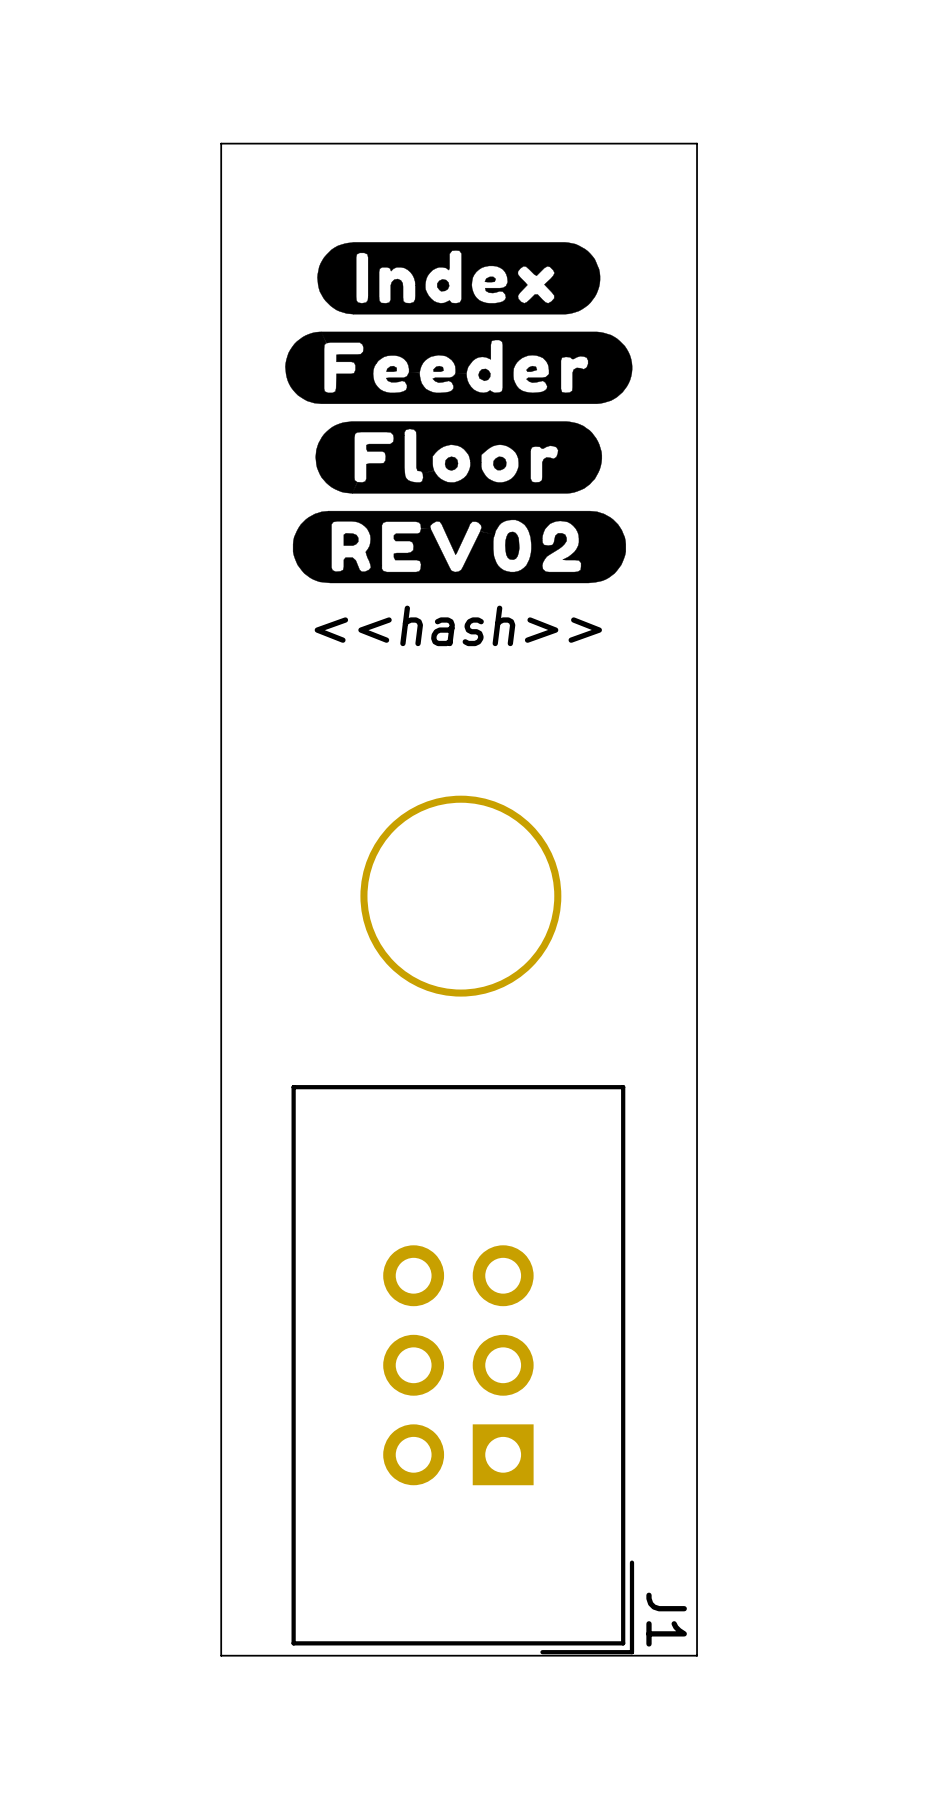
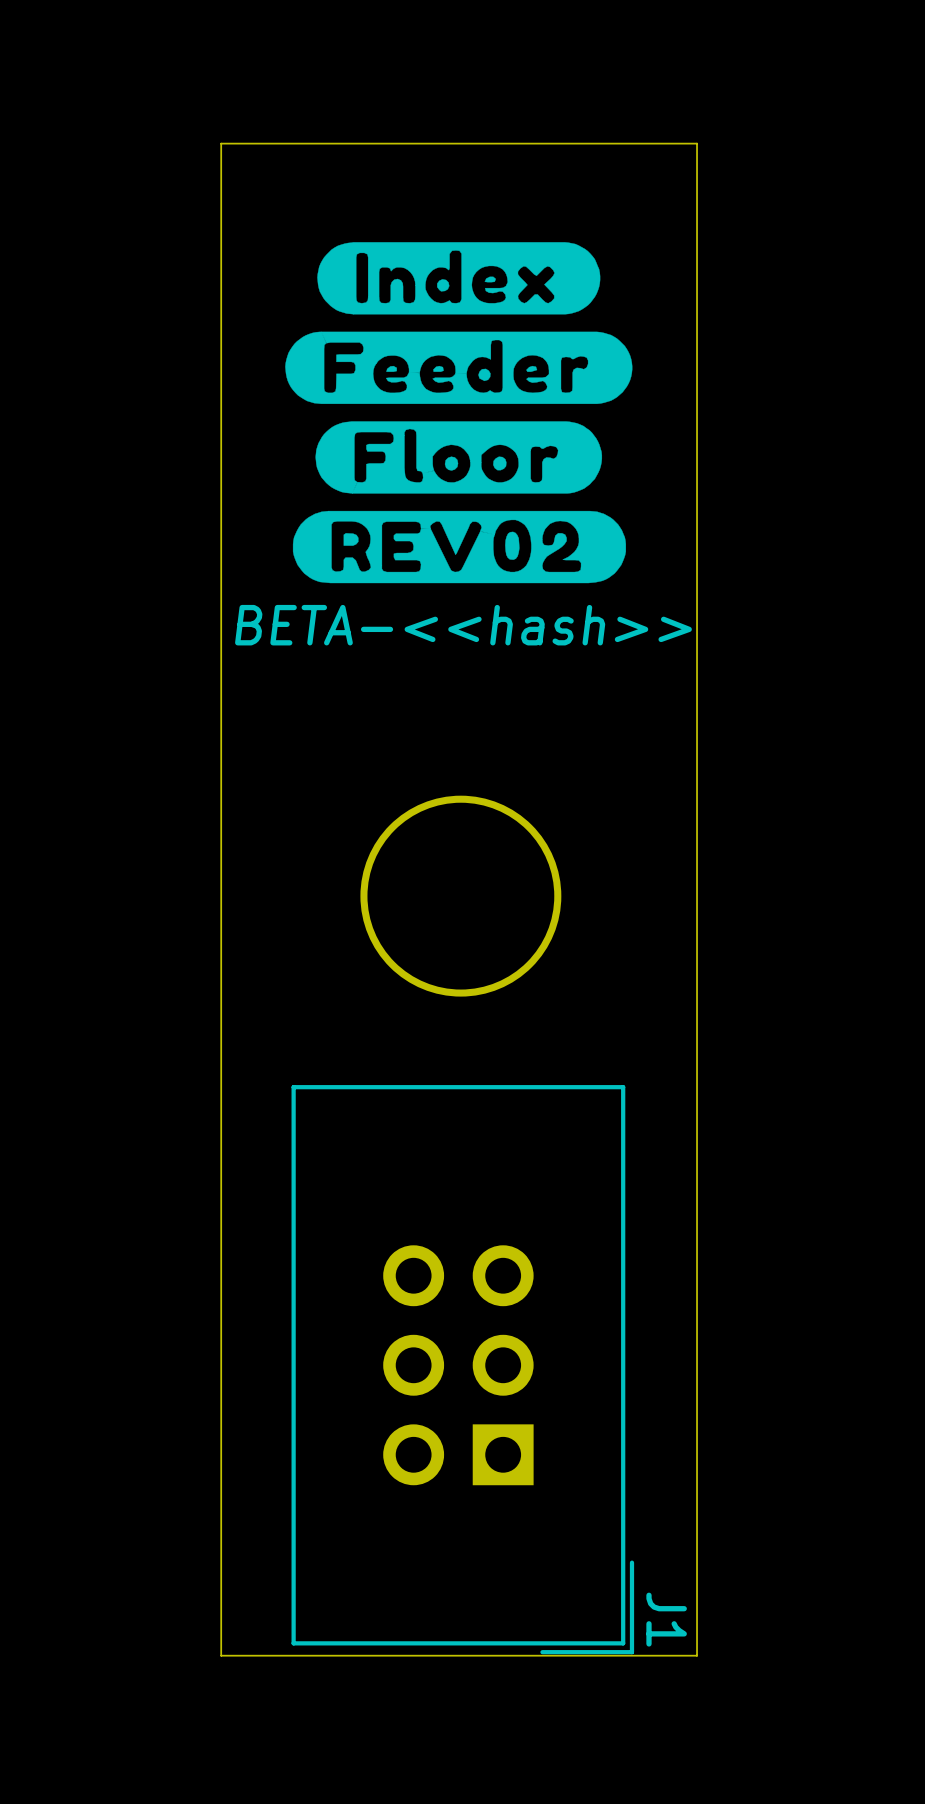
text: <<hash>> (458, 625) -> BETA-<<hash>> (463, 625)

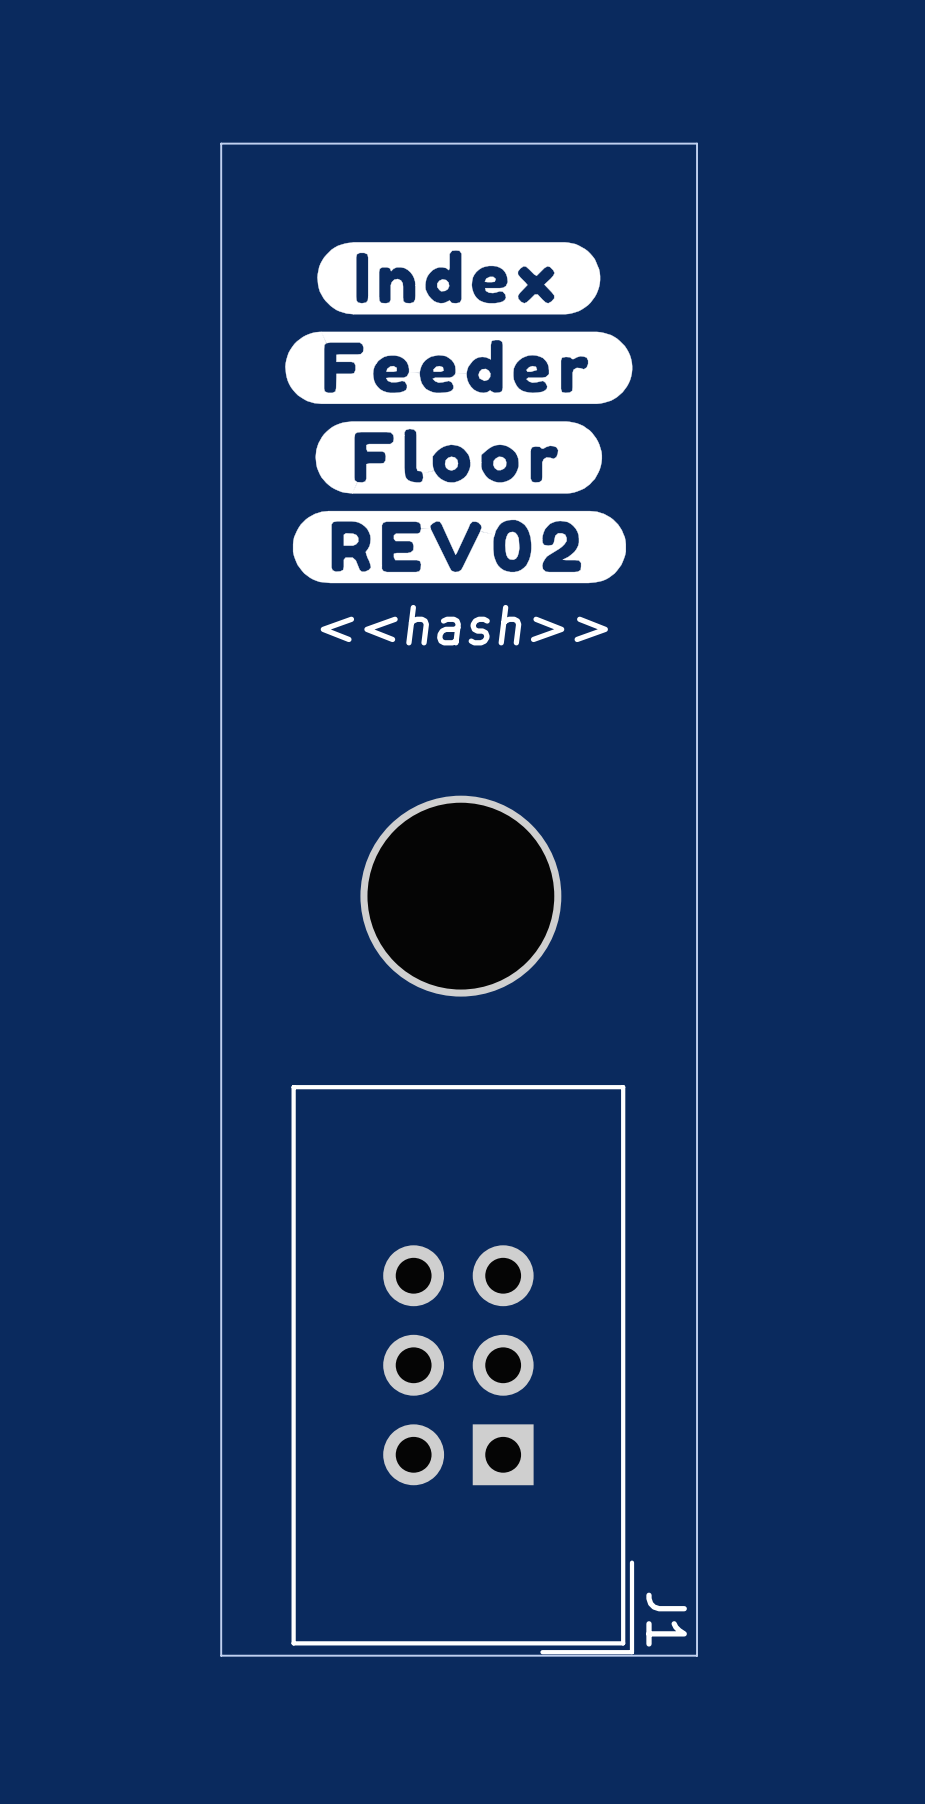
text: BETA-<<hash>> (463, 625) -> <<hash>> (464, 625)

